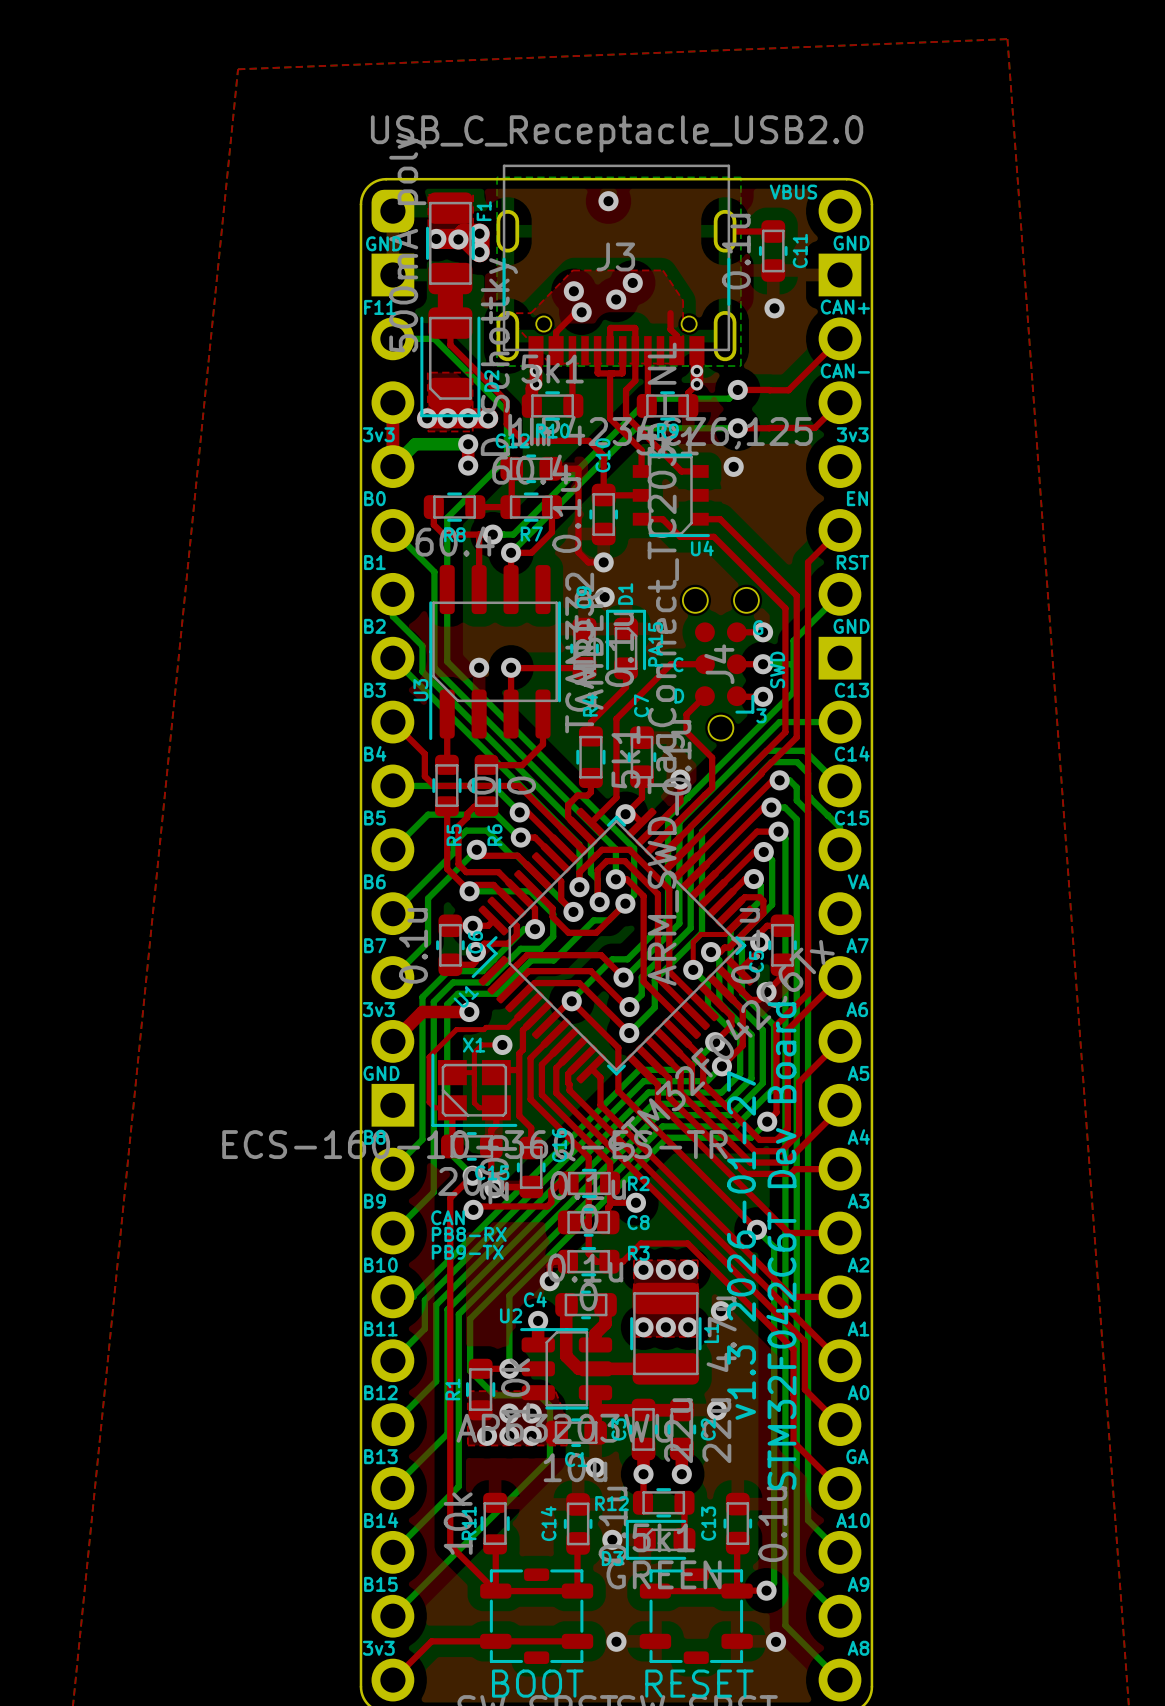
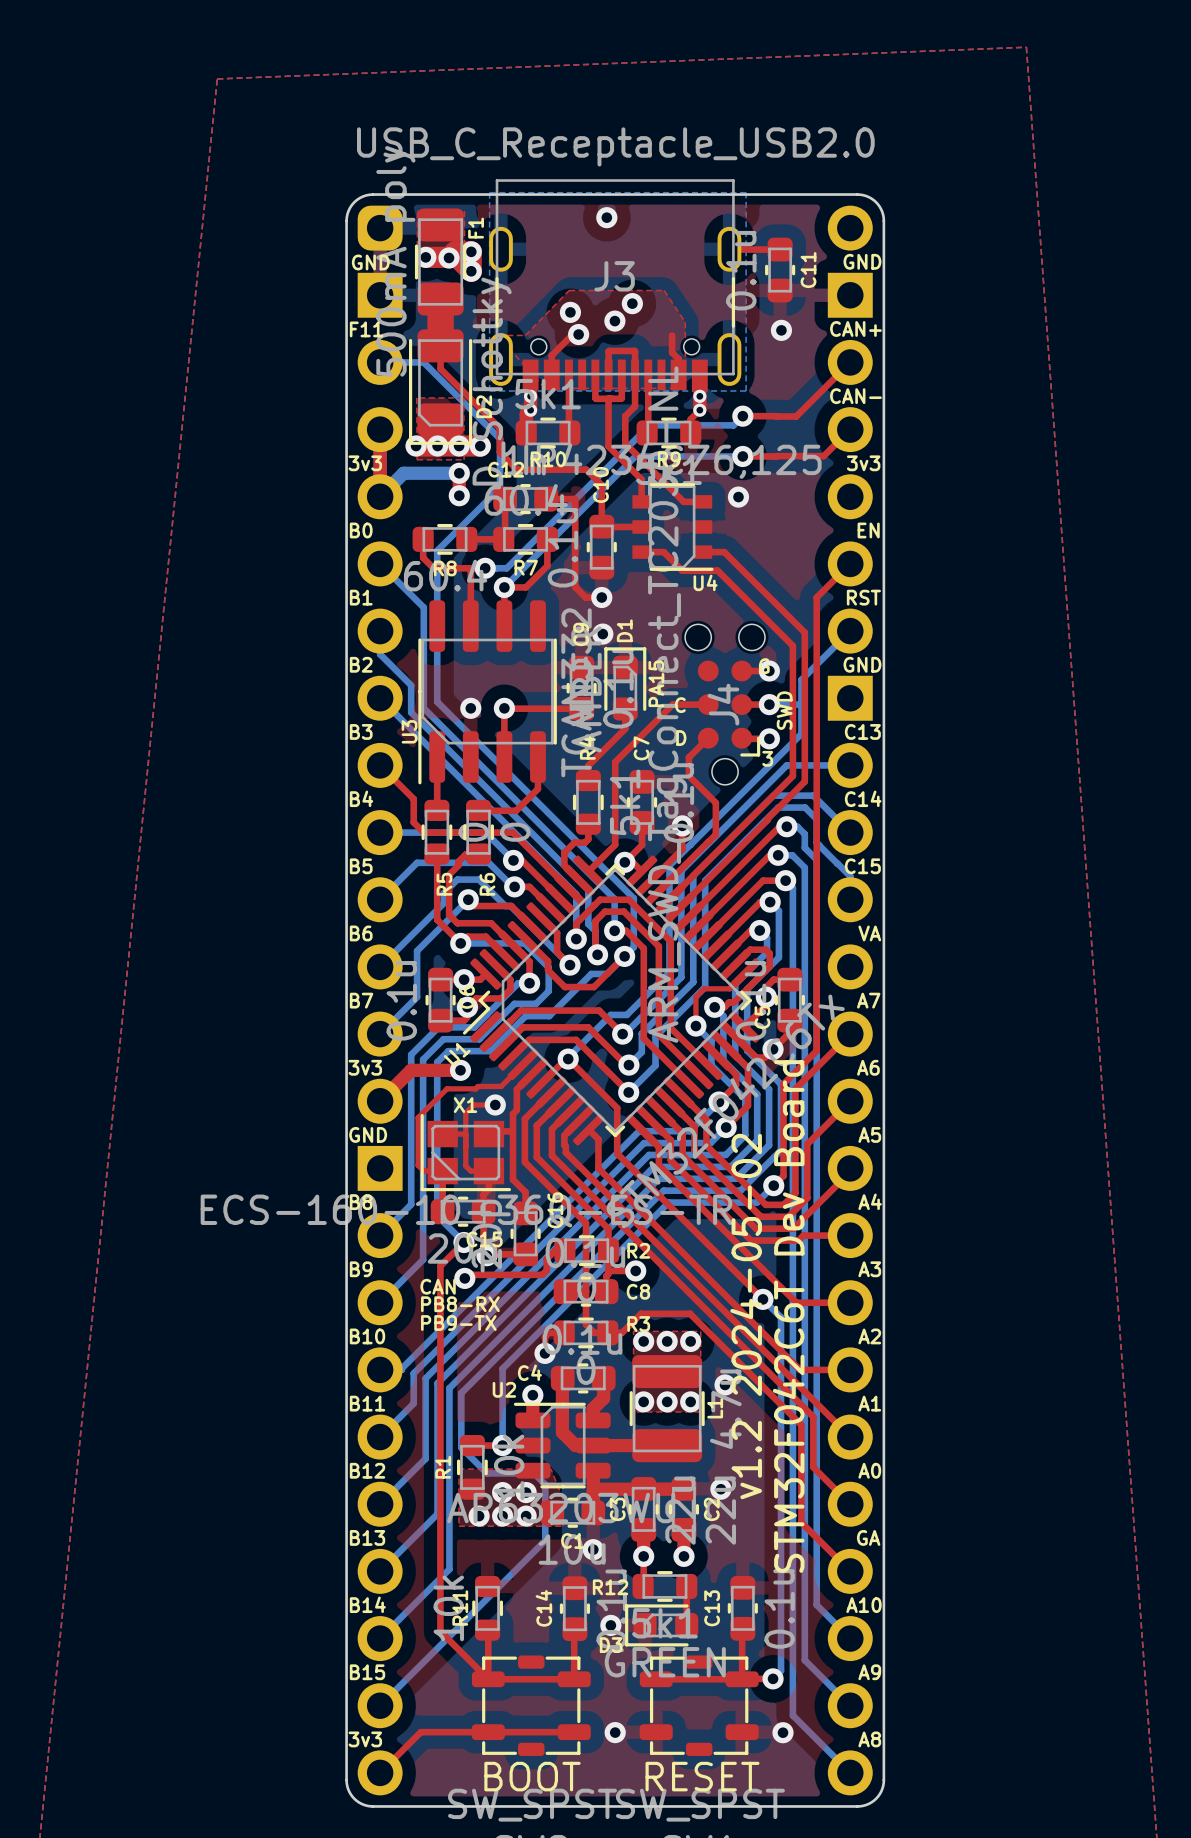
text: VBUS (793, 192) -> none
text: v1.3 2026-01-27 (741, 1245) -> v1.2 2024-05-02 (746, 1316)

